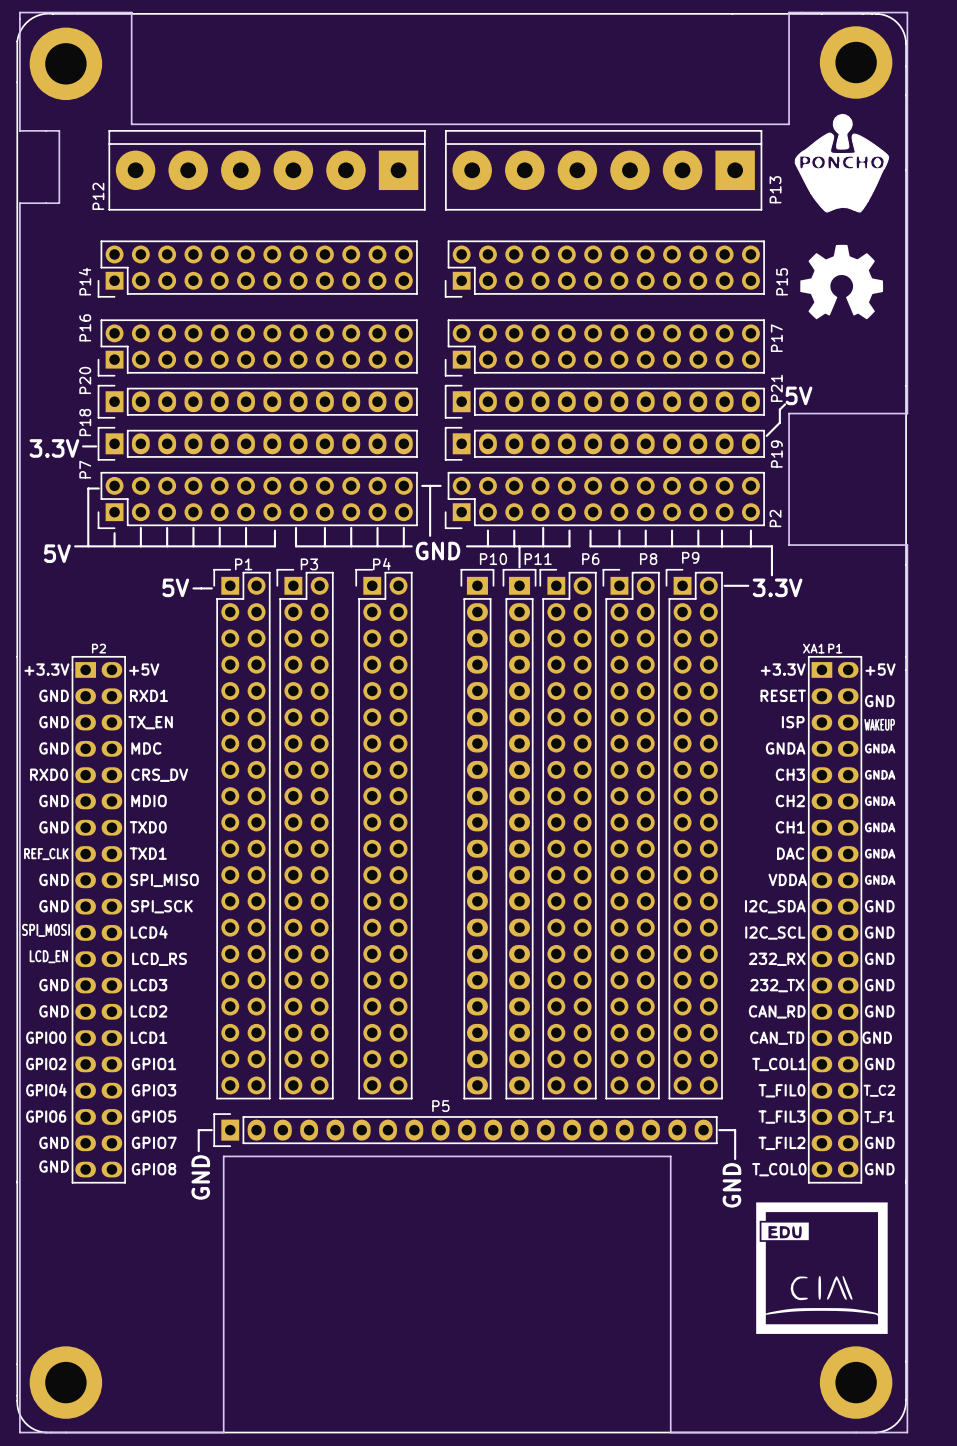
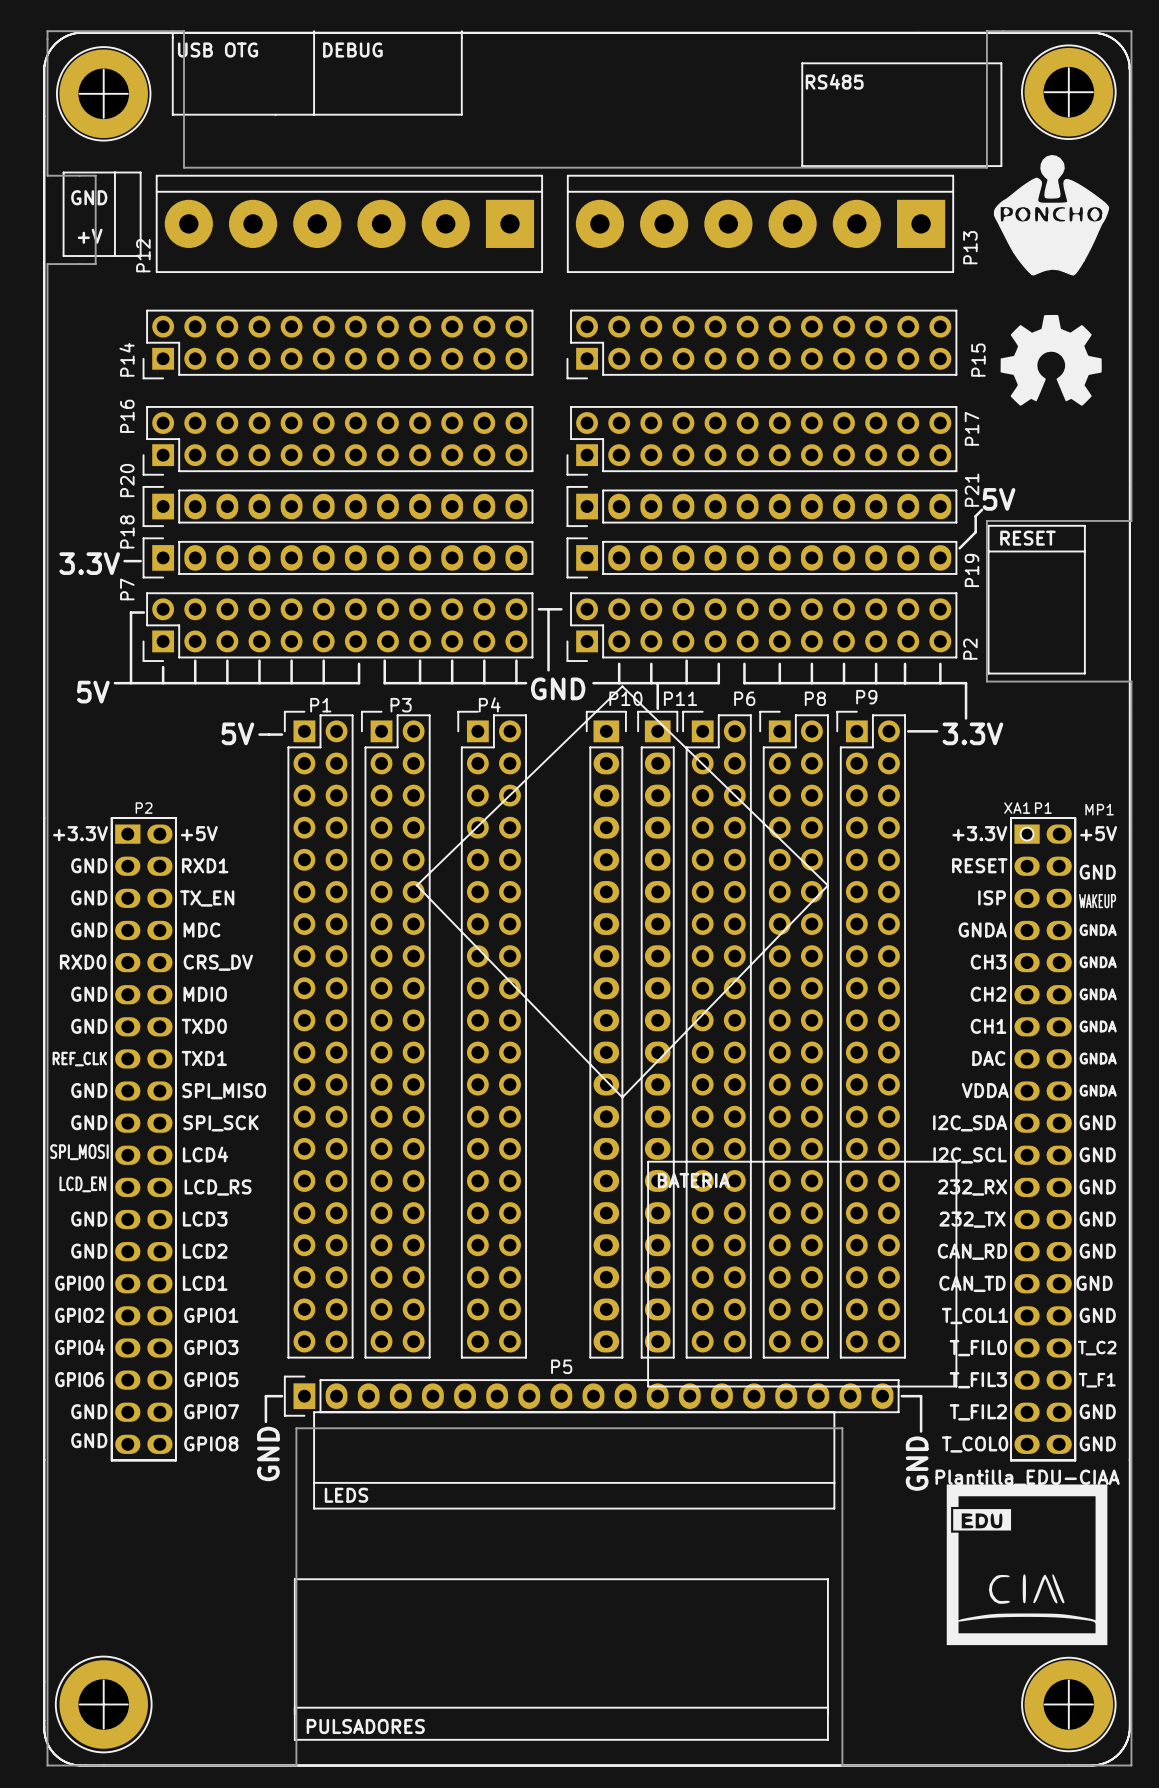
MP1: none -> Plantilla_EDU-CIAA (587, 898)

